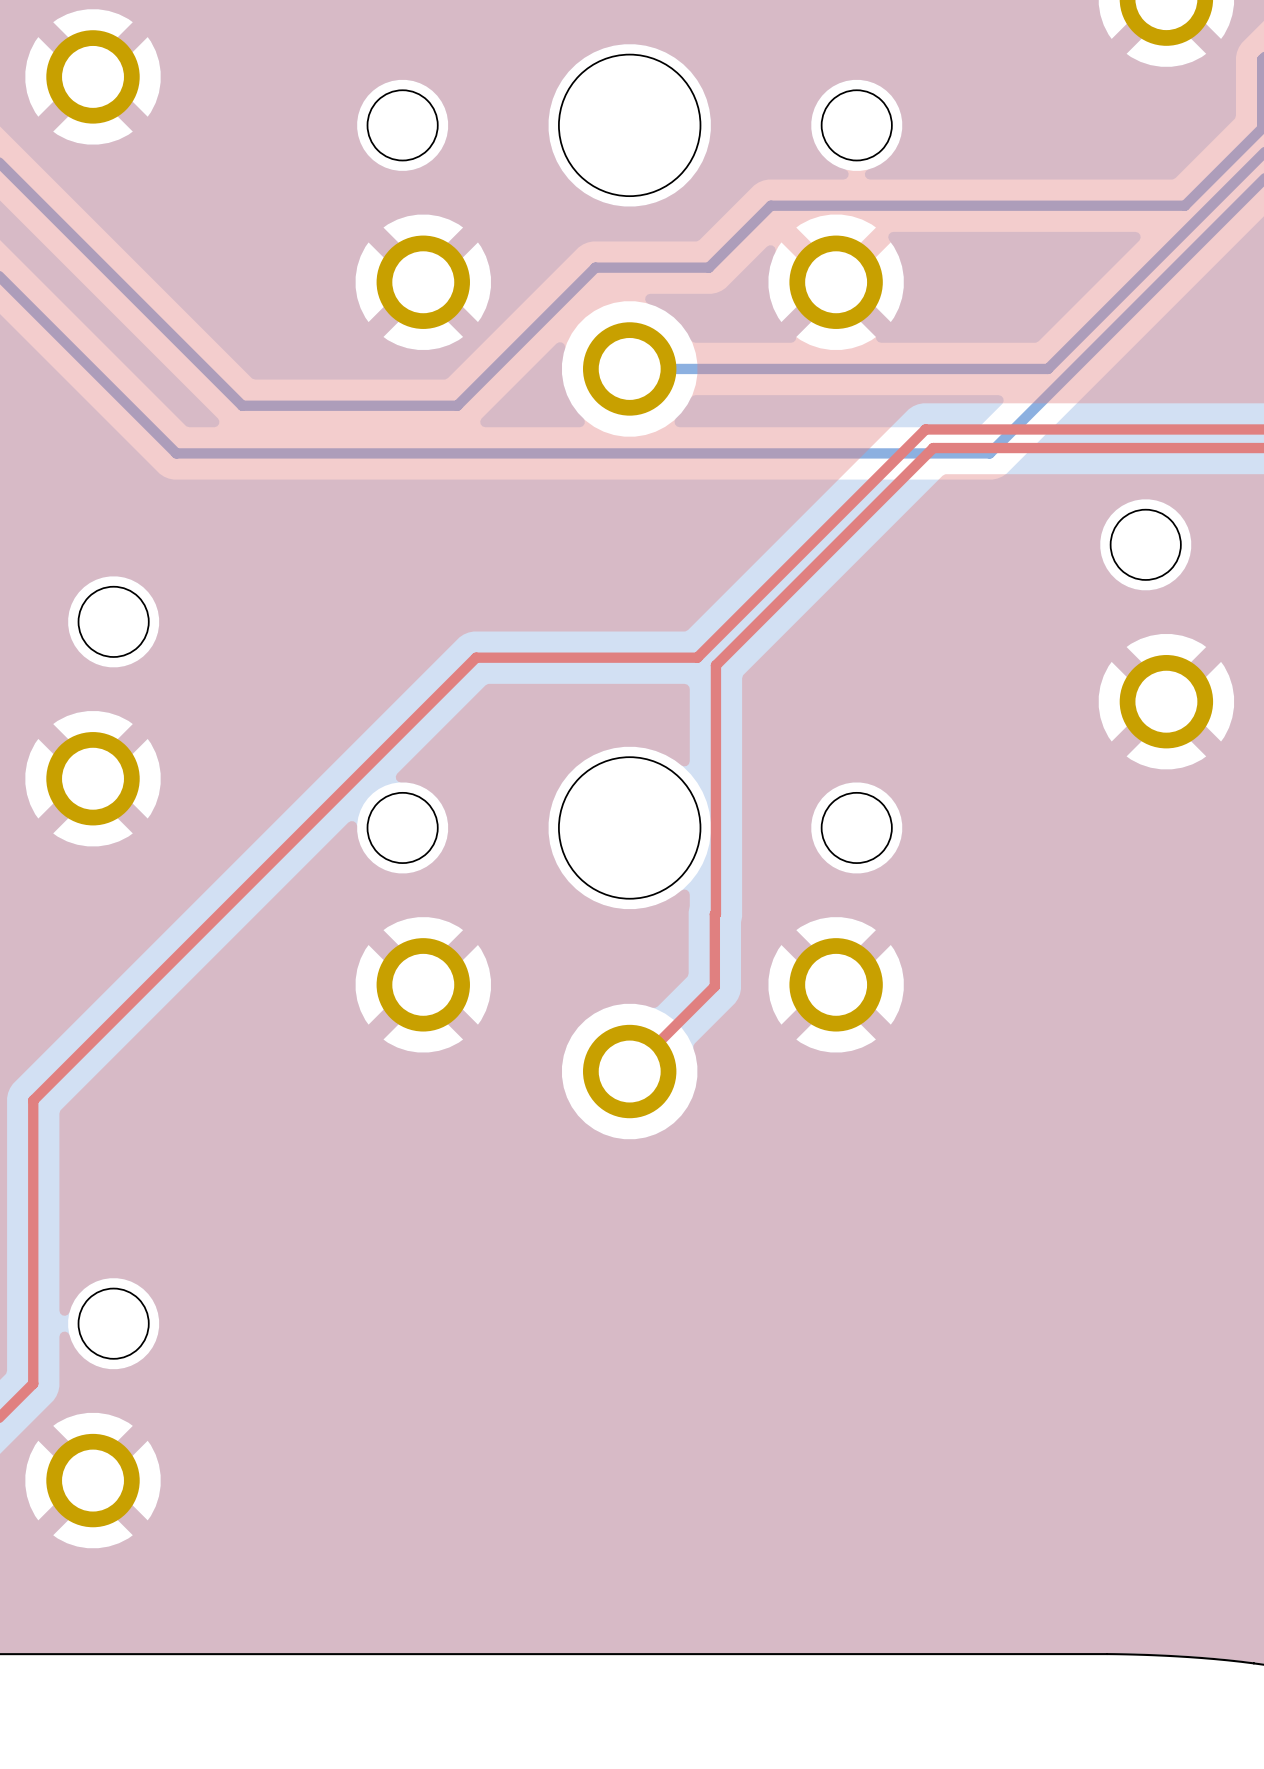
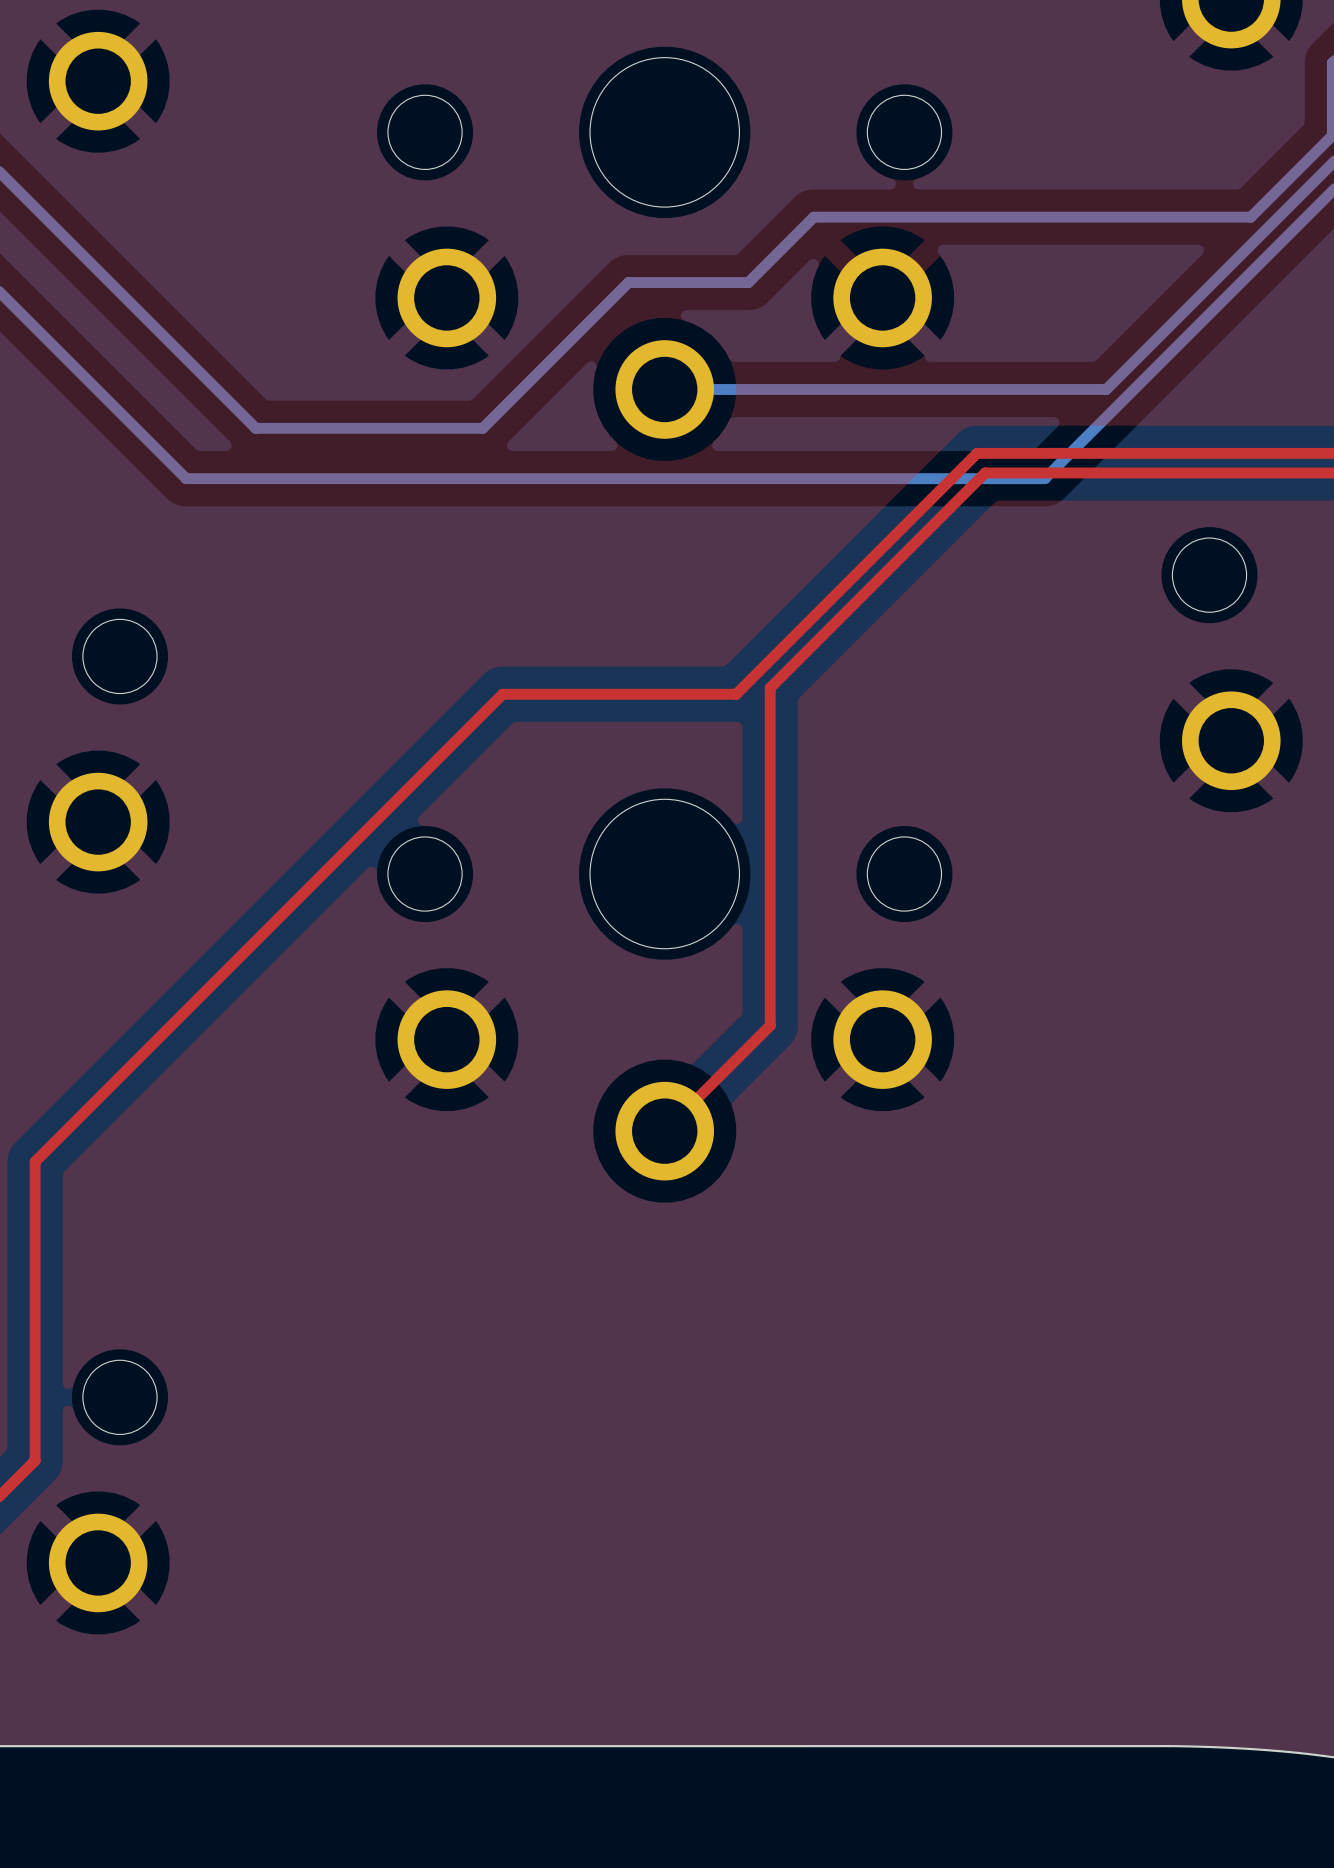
top track: (729, 651) (715, 665) (714, 986) -> (770, 687) (770, 1025) (754, 1041)

